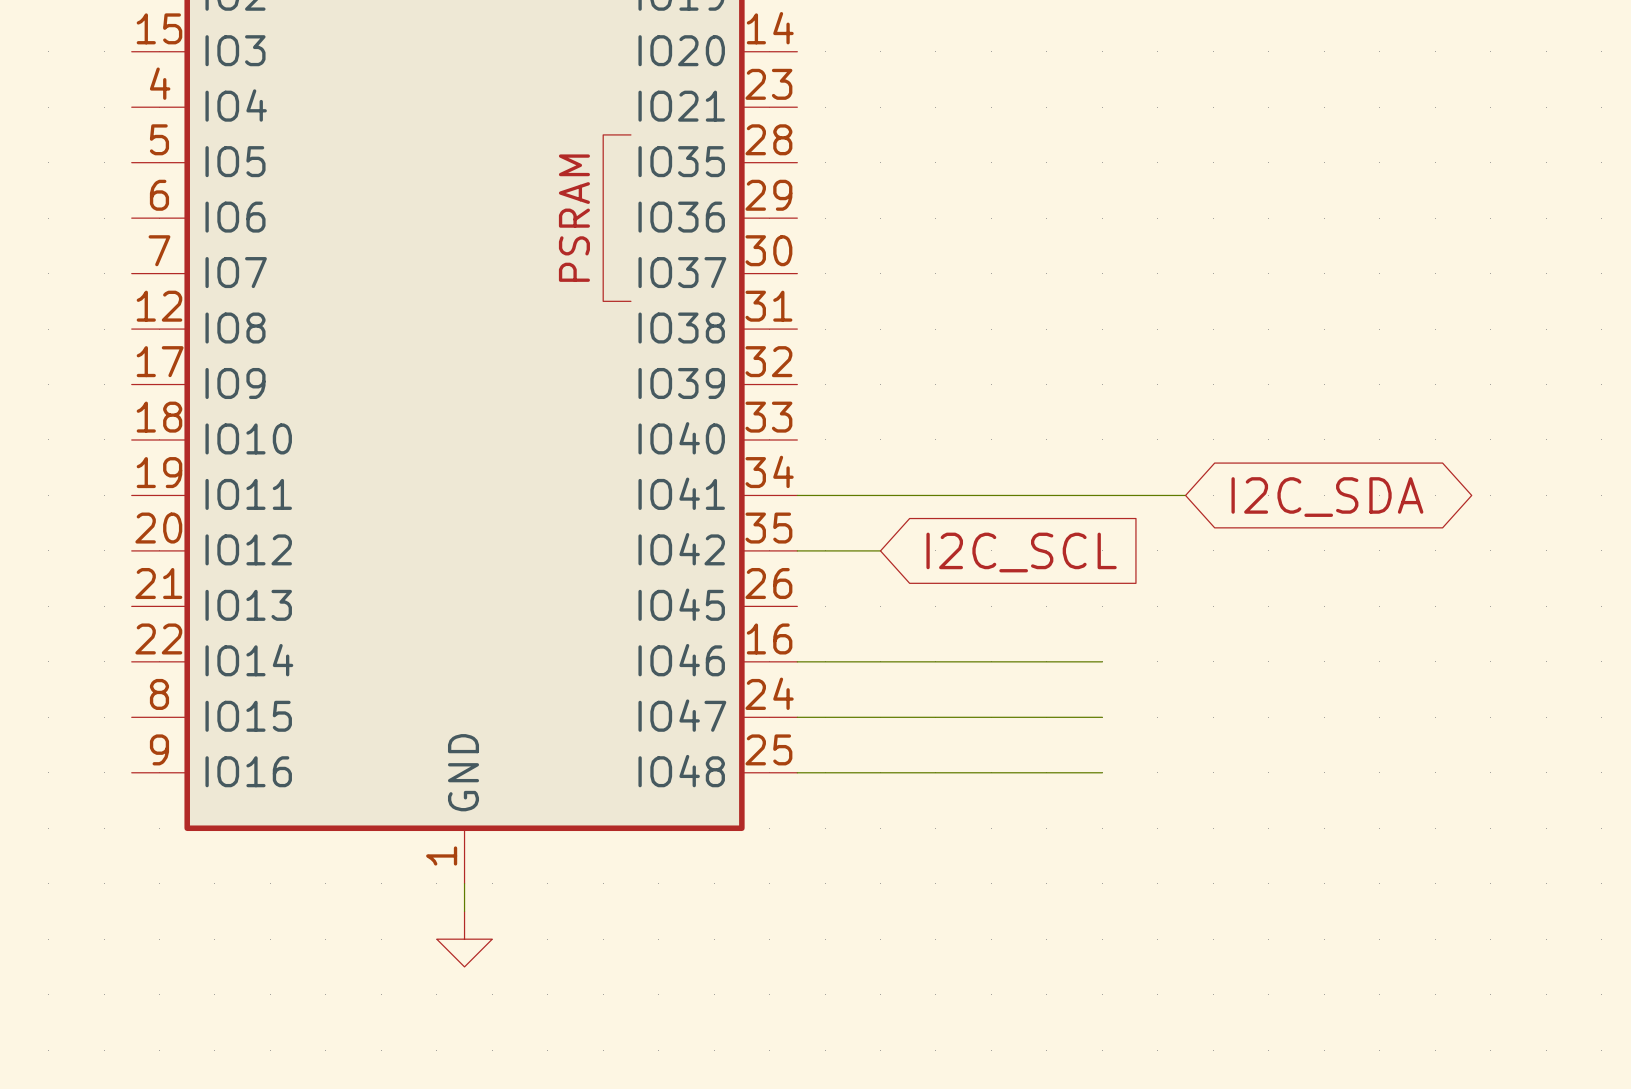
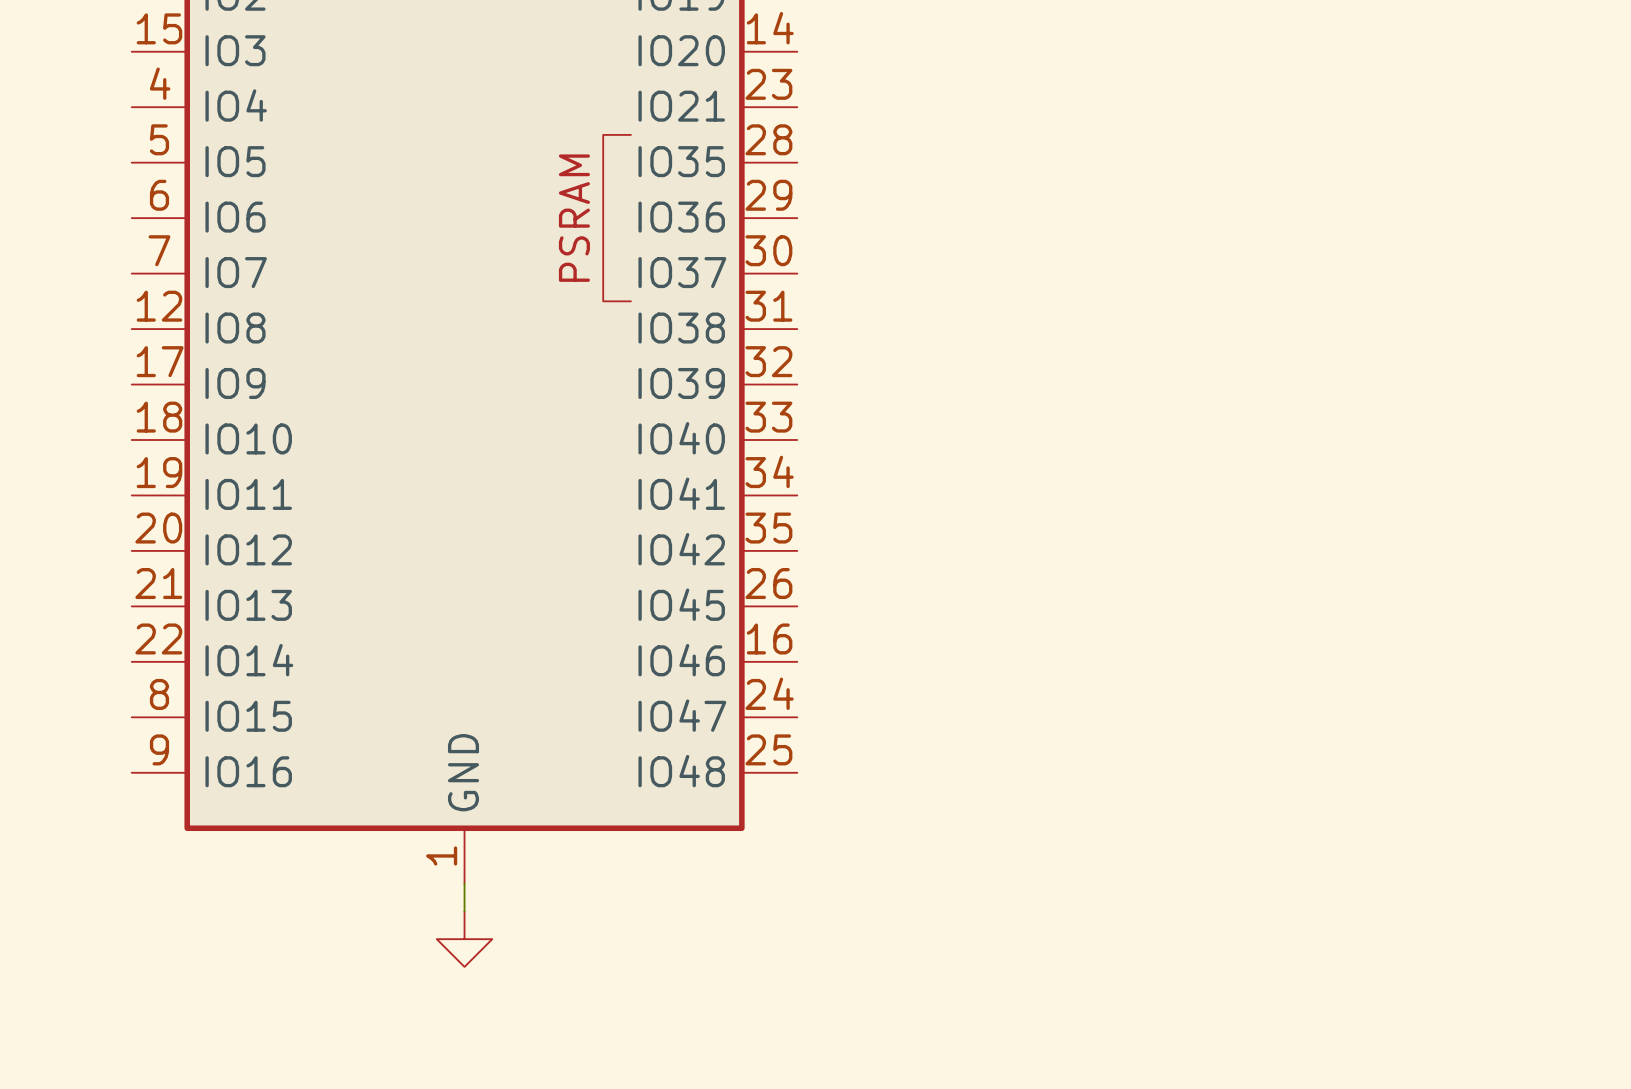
wire: (797, 495) (1185, 495) -> none
global label: I2C_SDA (1327, 497) -> none
wire: (797, 550) (880, 550) -> none
global label: I2C_SCL (1021, 552) -> none
wire: (797, 661) (1102, 661) -> none
wire: (797, 717) (1102, 717) -> none
wire: (797, 772) (1102, 772) -> none

